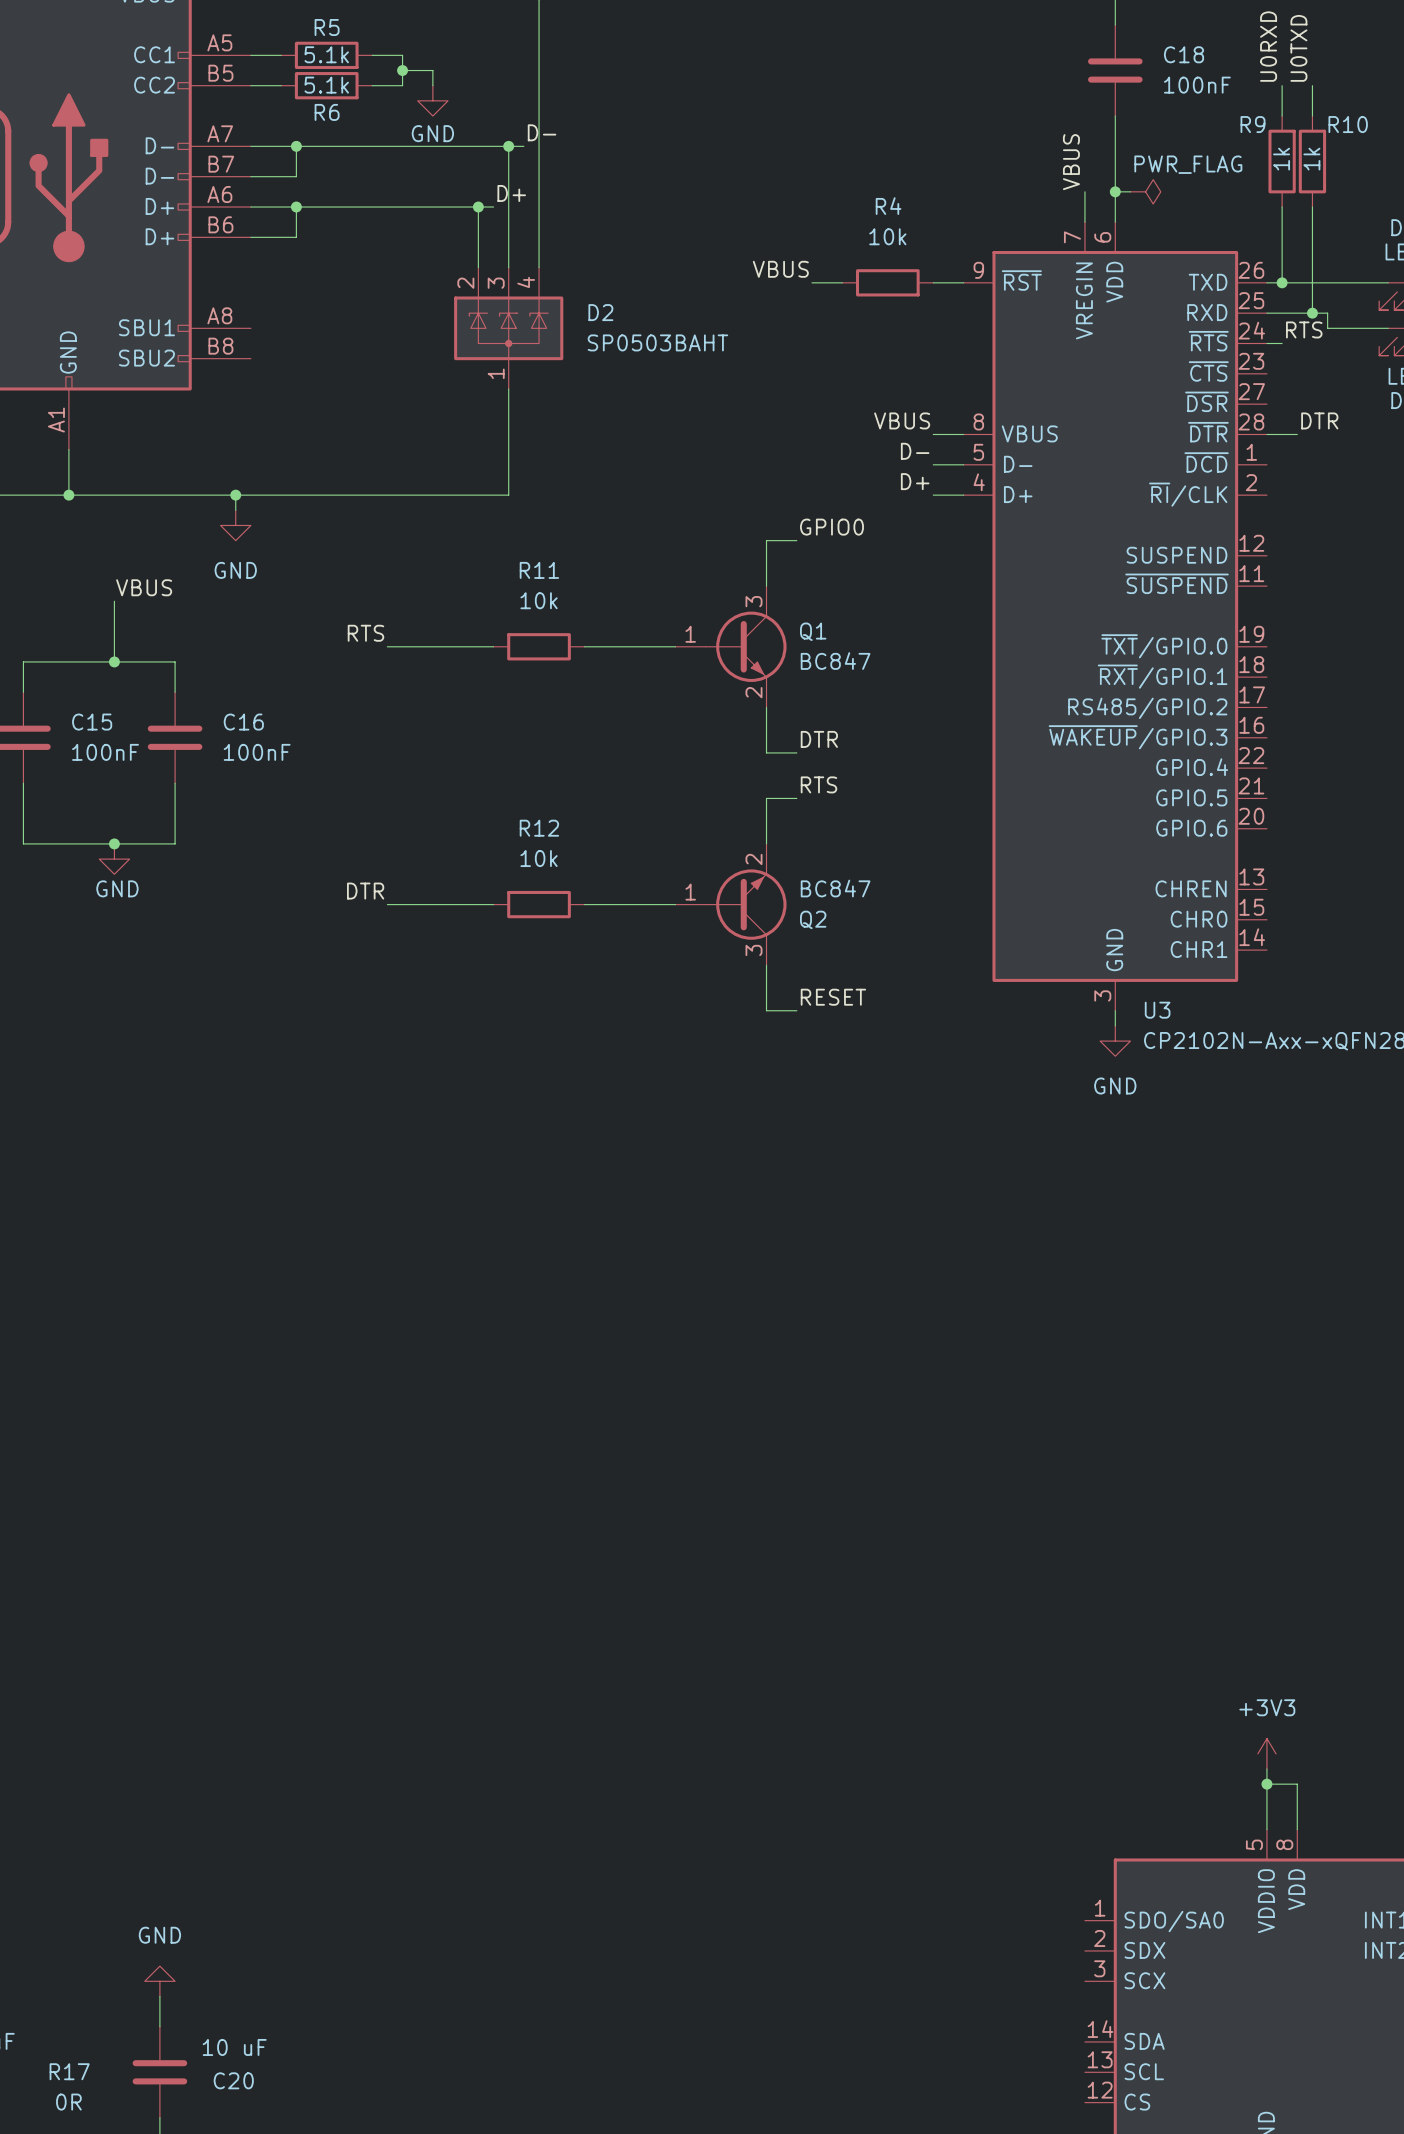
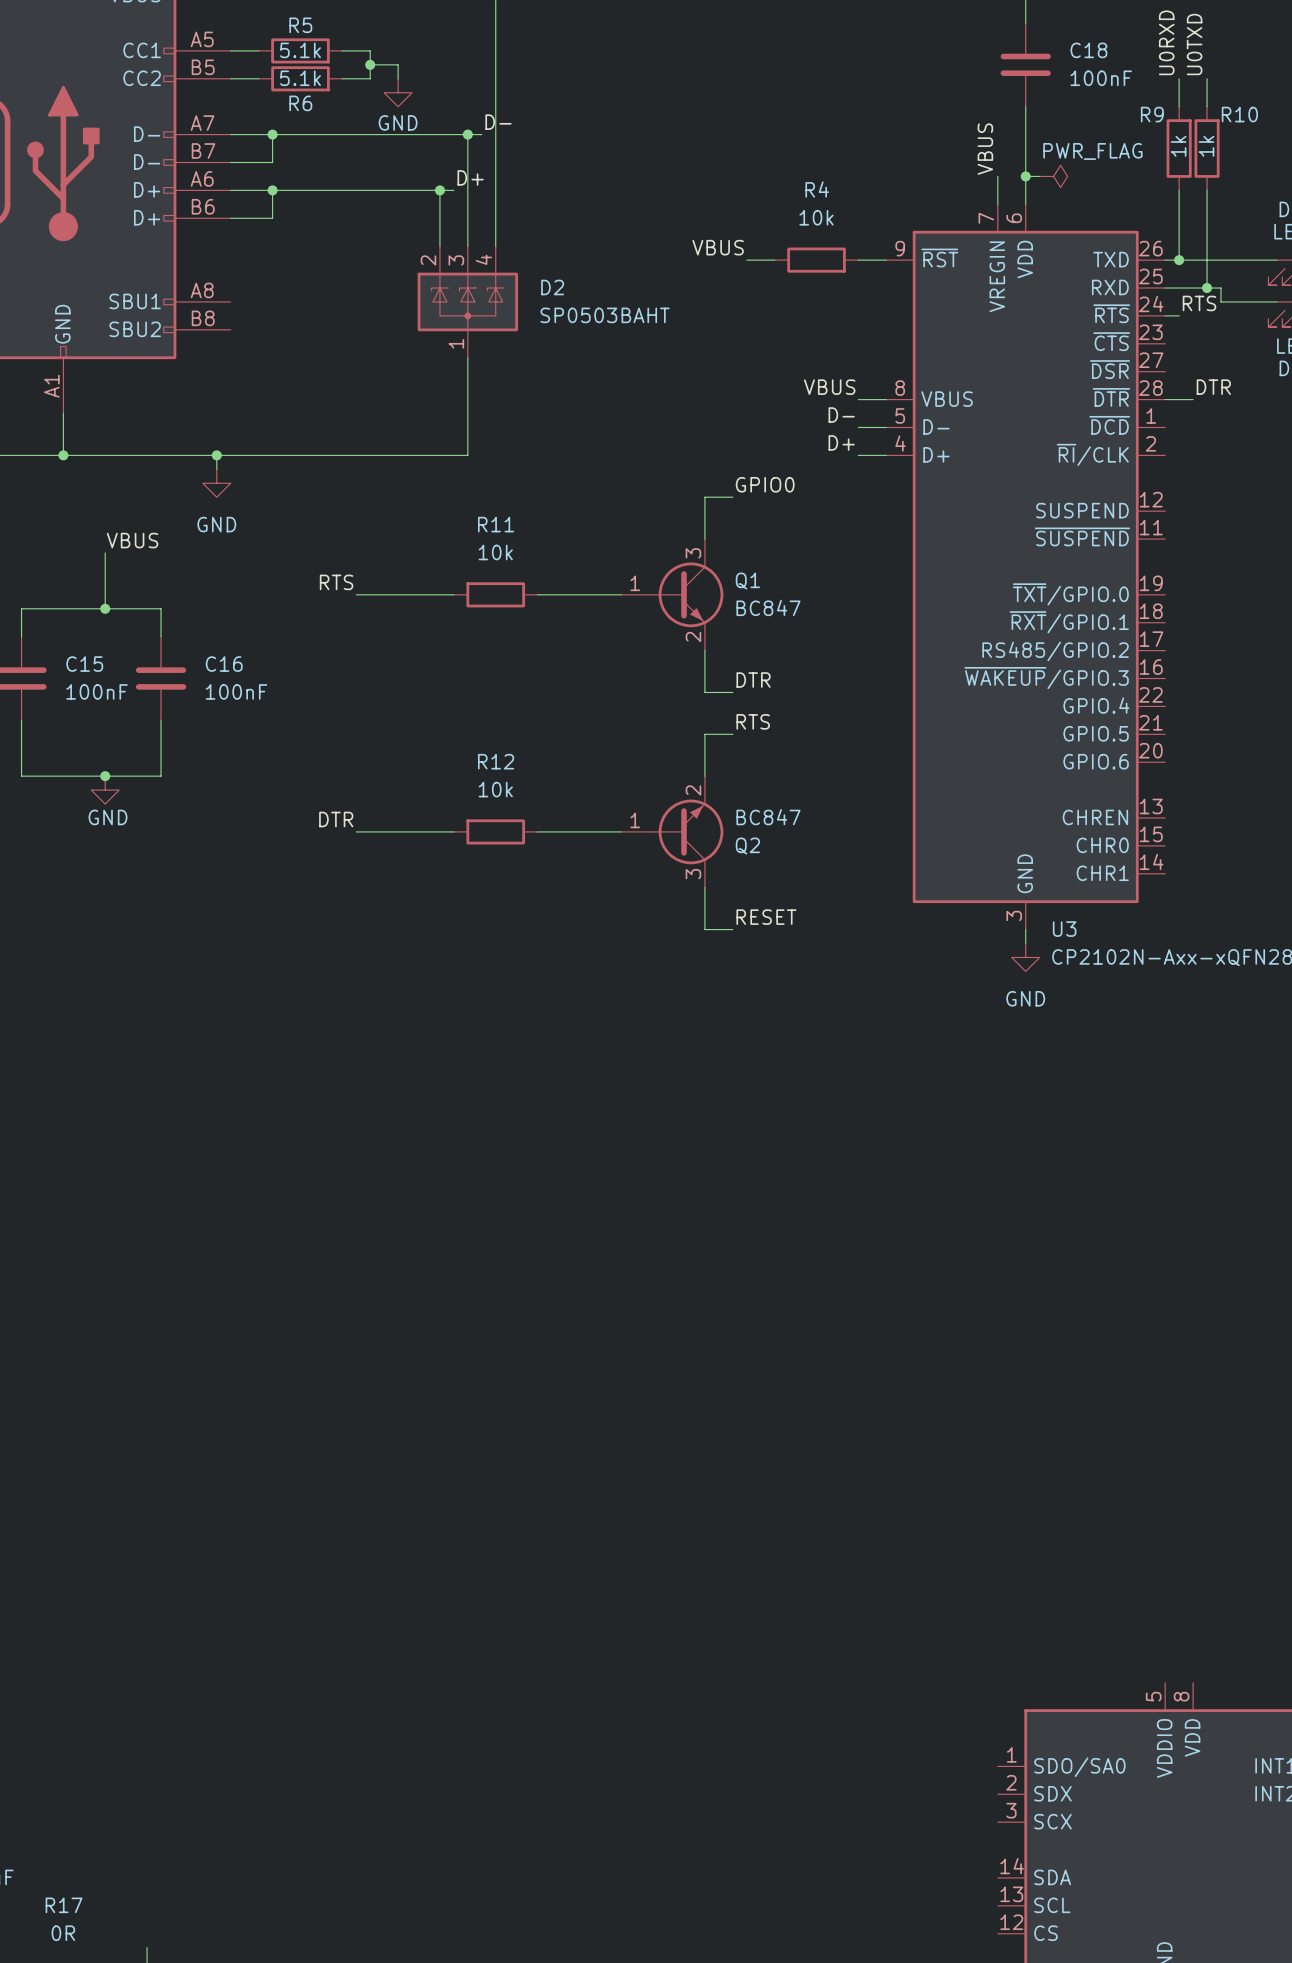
power symbol: +3V3 (1266, 1753) -> none
wire: (1266, 1769) (1266, 1829) -> none
wire: (1266, 1784) (1297, 1784) (1297, 1829) -> none
junction: (1266, 1784) -> none
power symbol: GND (159, 1981) -> none
wire: (159, 1996) (159, 2026) -> none
C20: 10 uF (159, 2072) -> none

